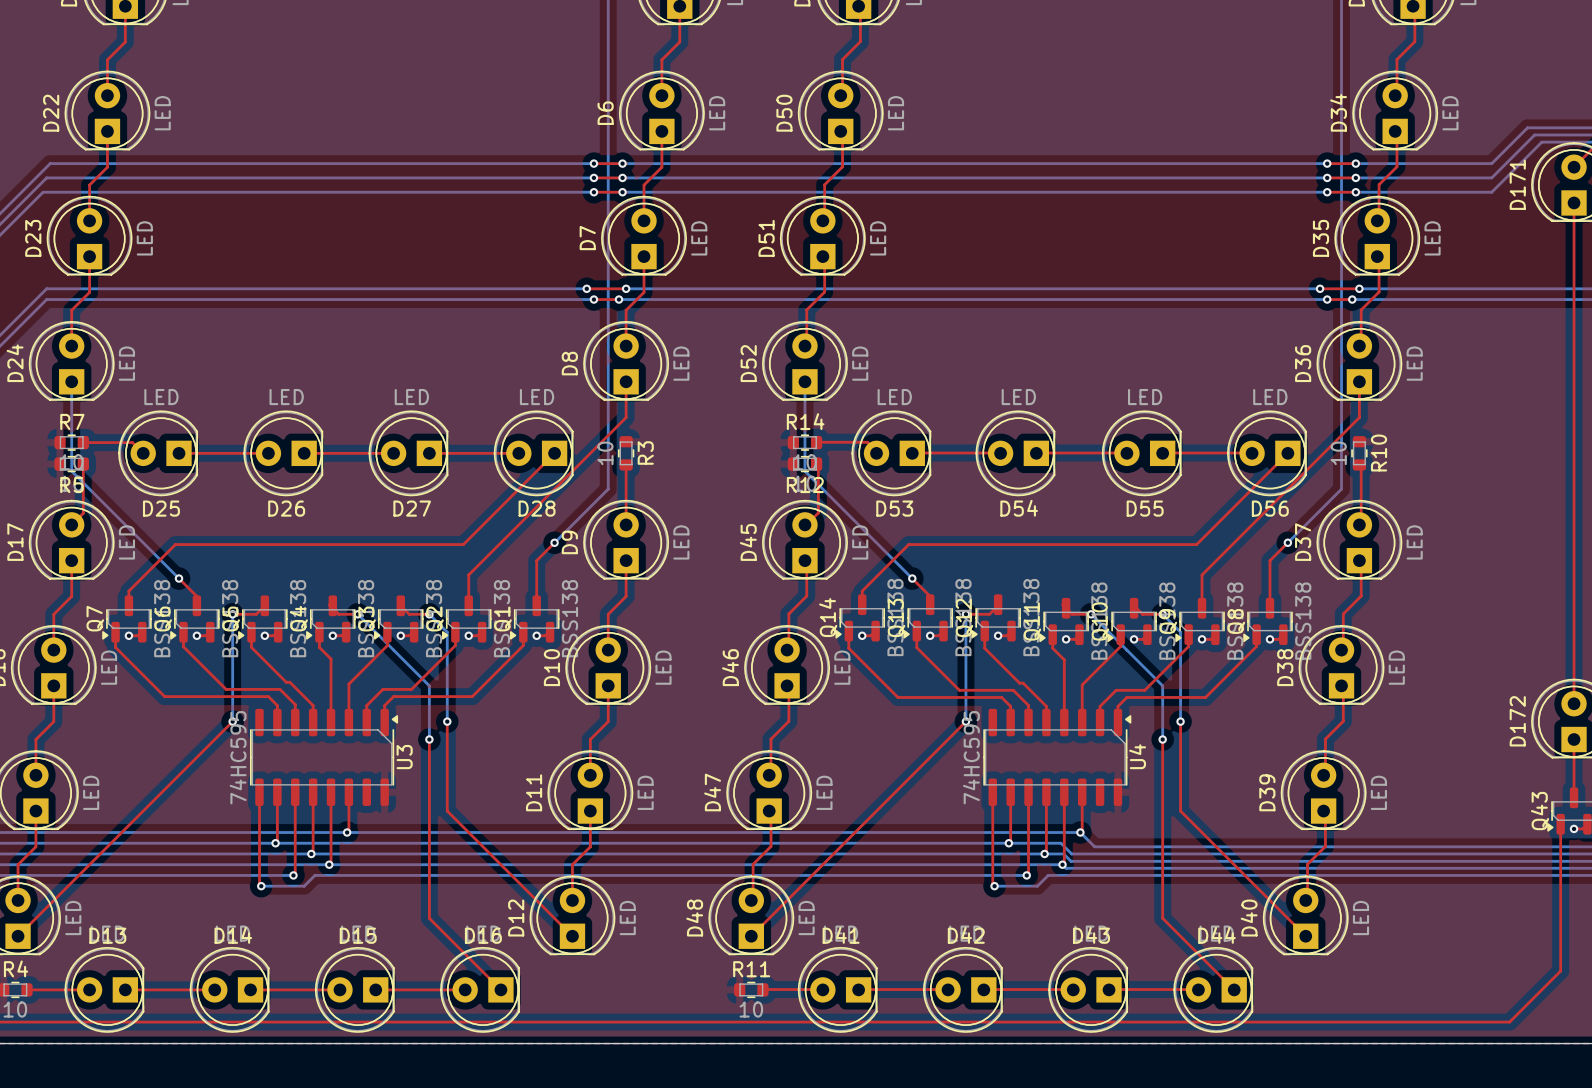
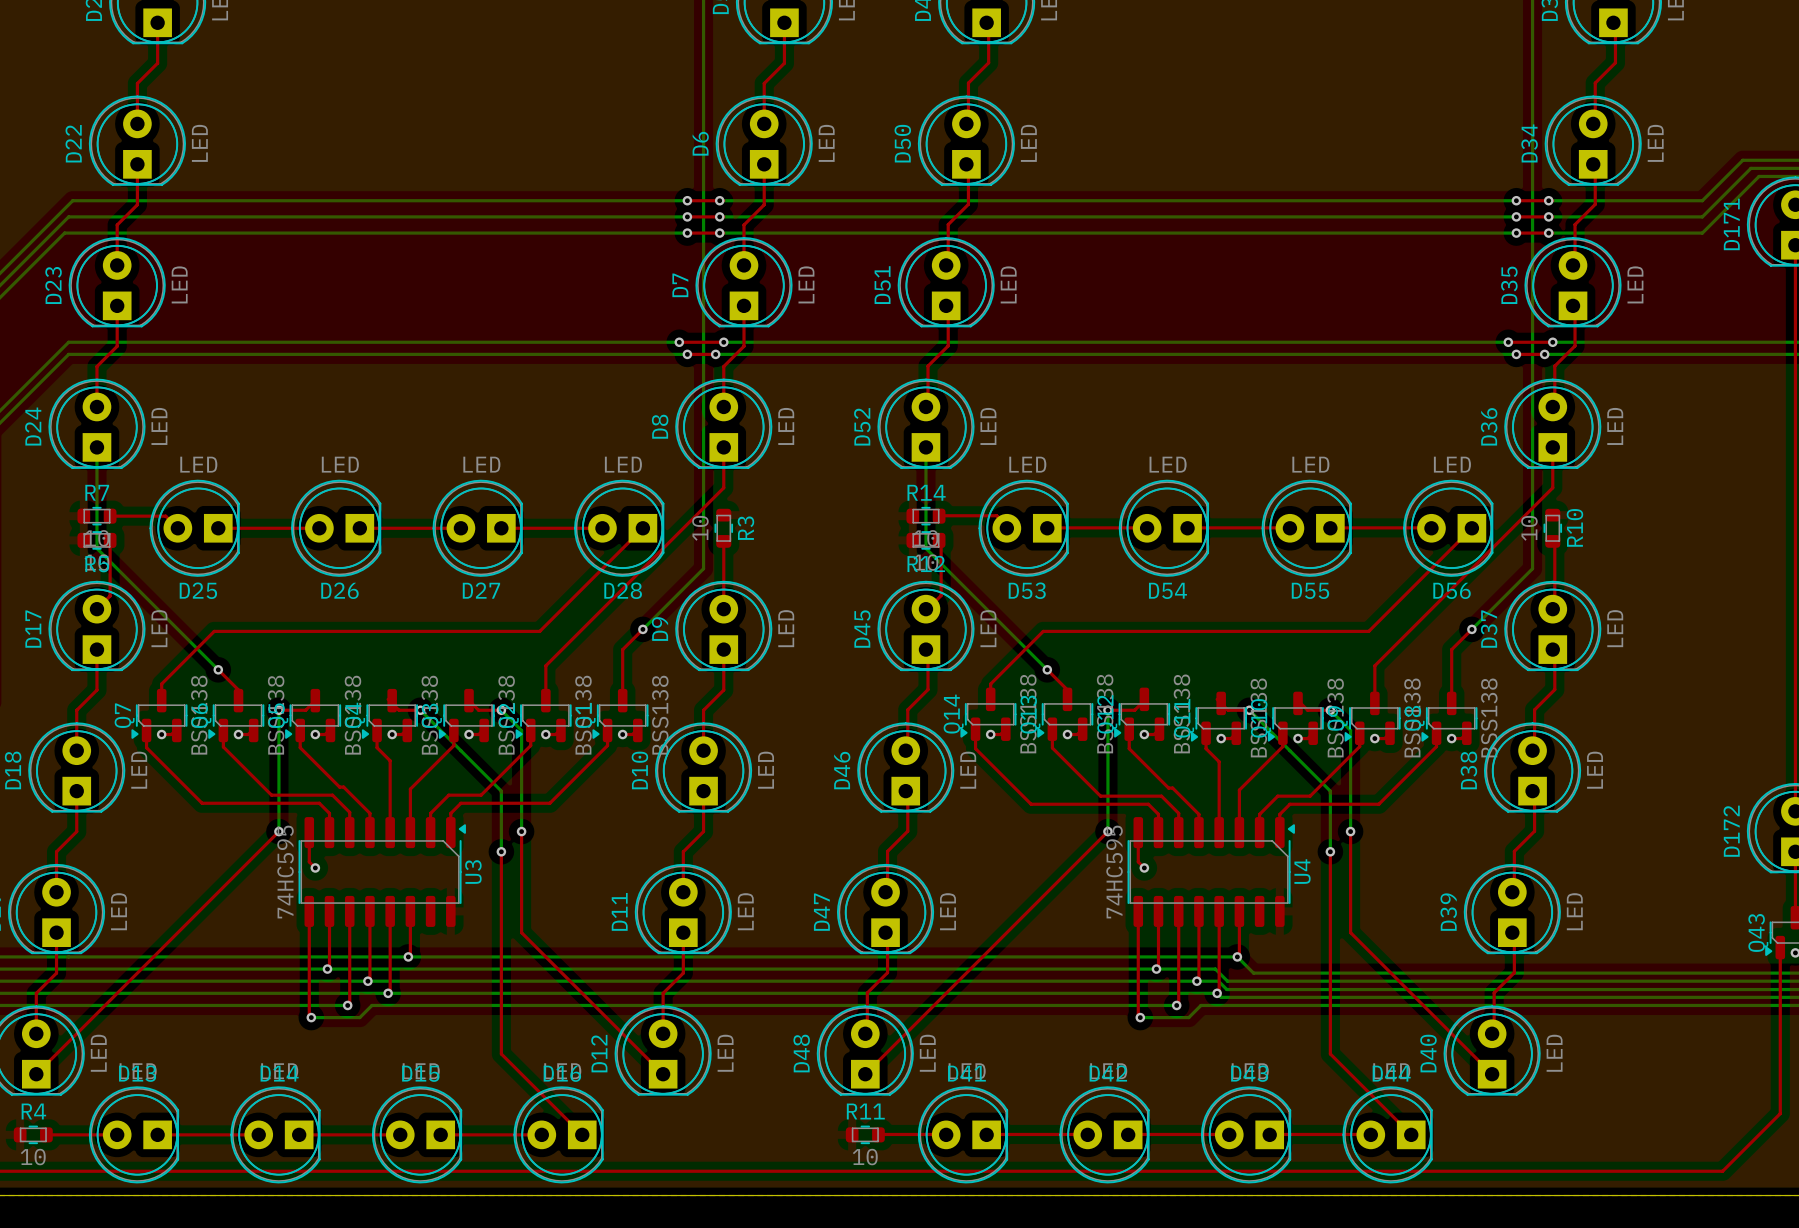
top track: none -> (309, 832) (309, 861) (315, 867)
top track: none -> (1138, 832) (1138, 861) (1144, 867)
via: none -> (315, 867)
via: none -> (1144, 867)

